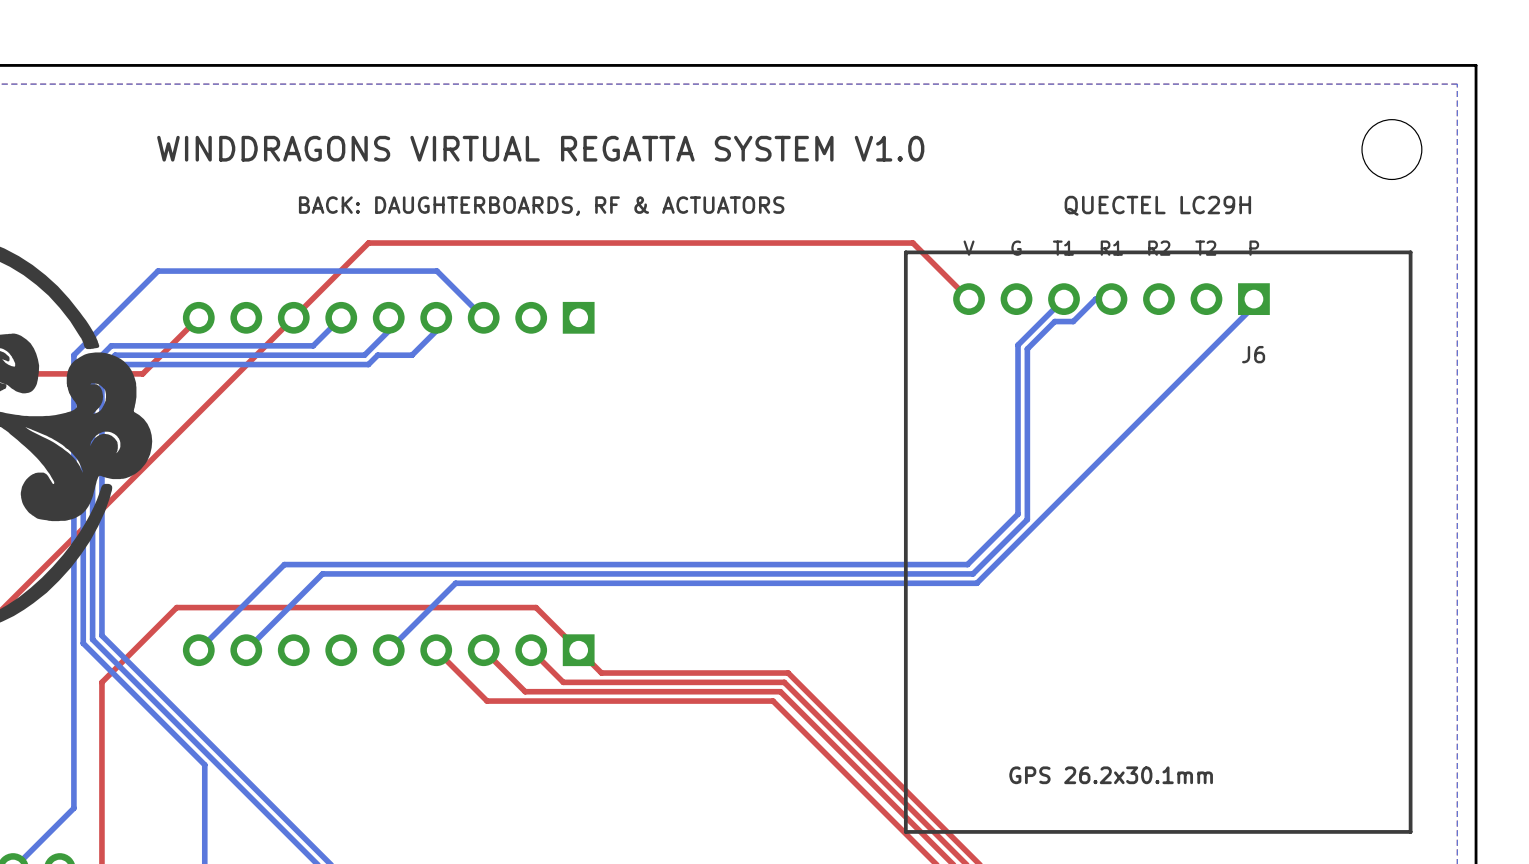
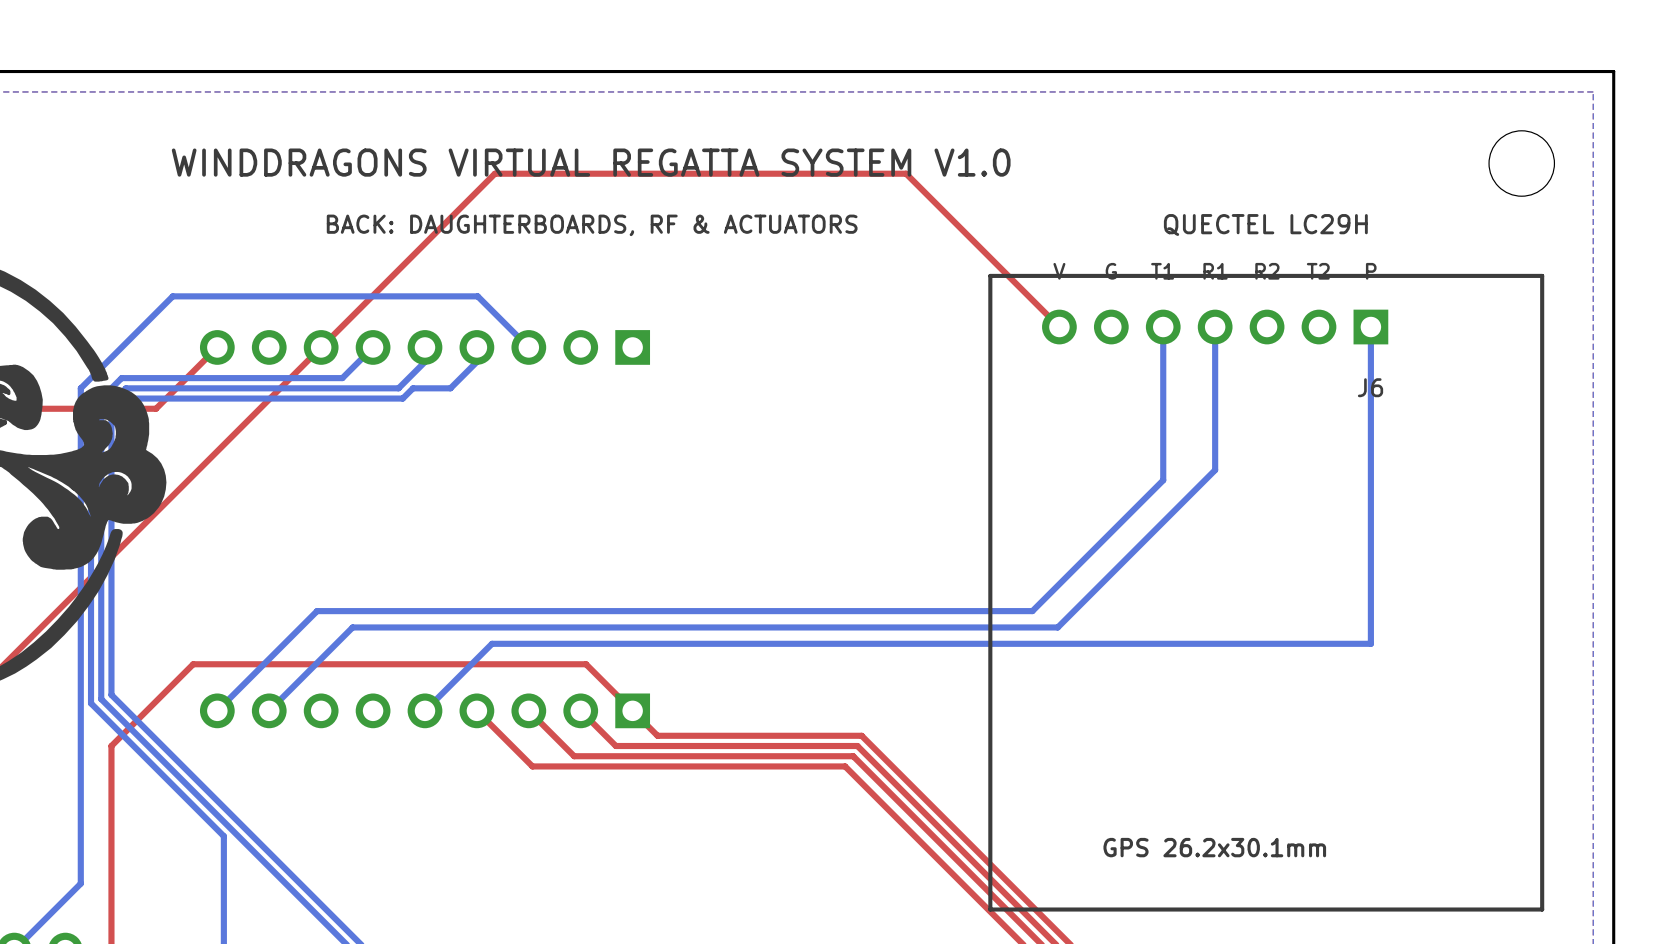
top track: (912, 243) (368, 243) -> (998, 265) (906, 173) (494, 173) (402, 265)
bottom track: (1064, 299) (1018, 345) (1018, 514) (967, 564) (284, 564) -> (1163, 327) (1163, 480) (1032, 611) (317, 611) (310, 617)
bottom track: (1111, 299) (1095, 299) (1073, 321) (1054, 321) (1027, 348) (1027, 519) (973, 573) (967, 573) -> (1215, 327) (1215, 470) (1057, 627)
bottom track: (1253, 306) (976, 583) (455, 583) (450, 588) -> (1370, 334) (1370, 643) (492, 643)

